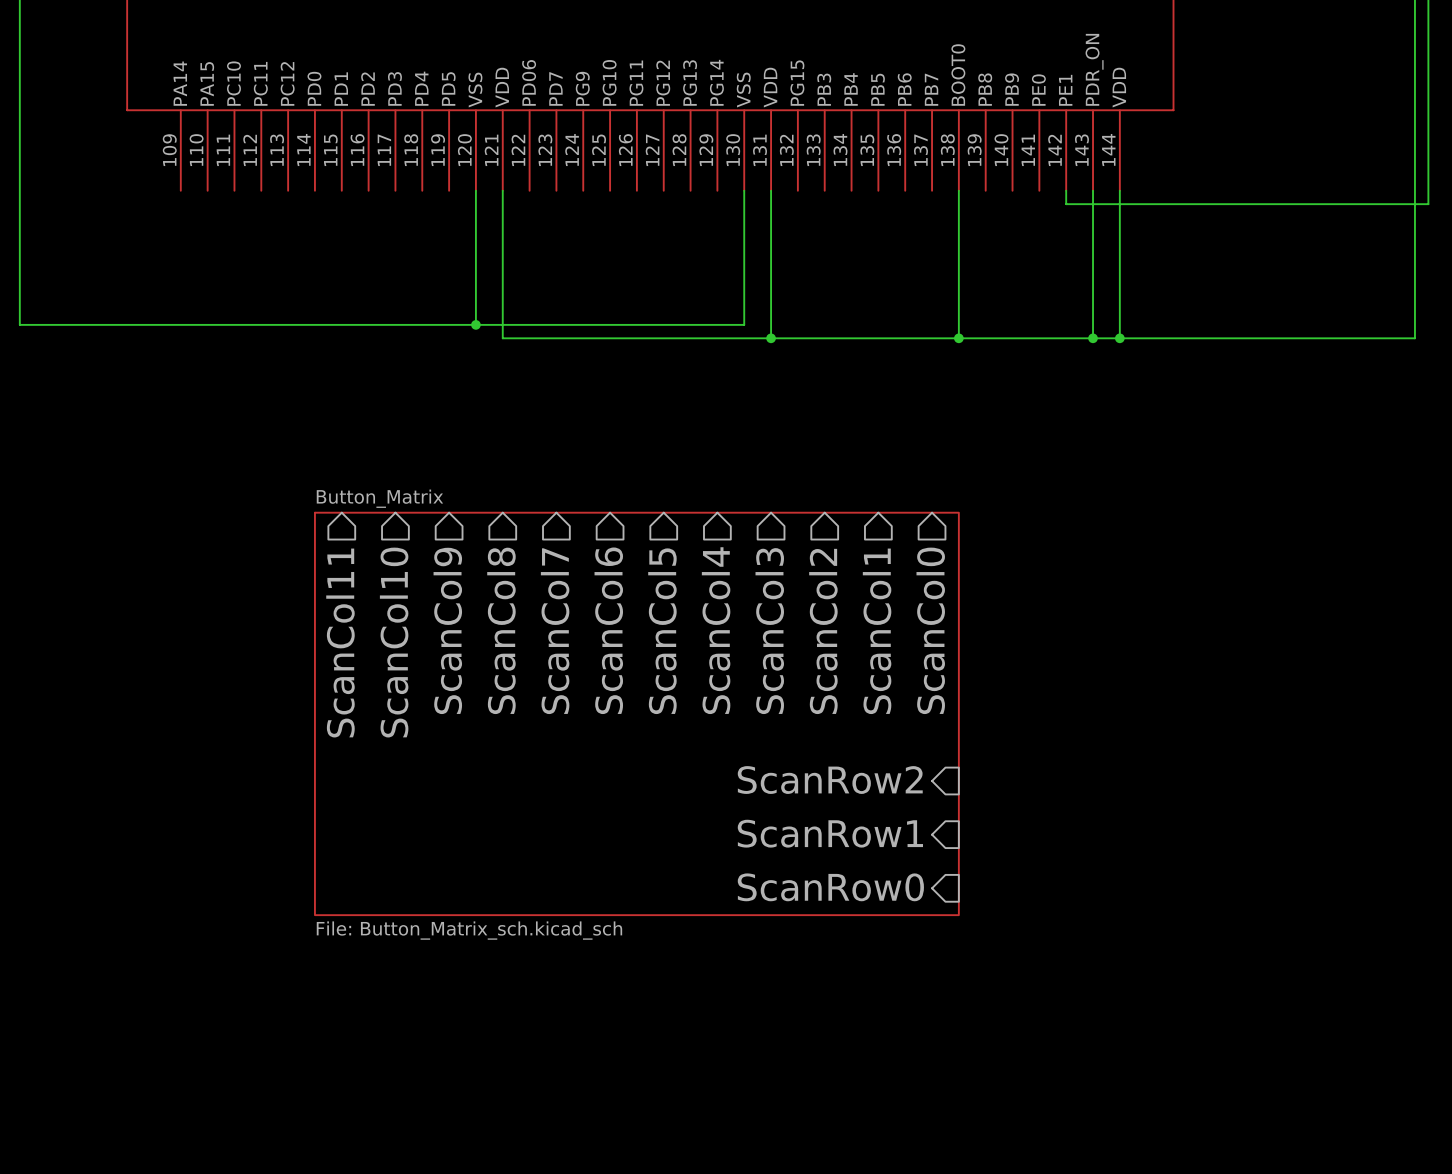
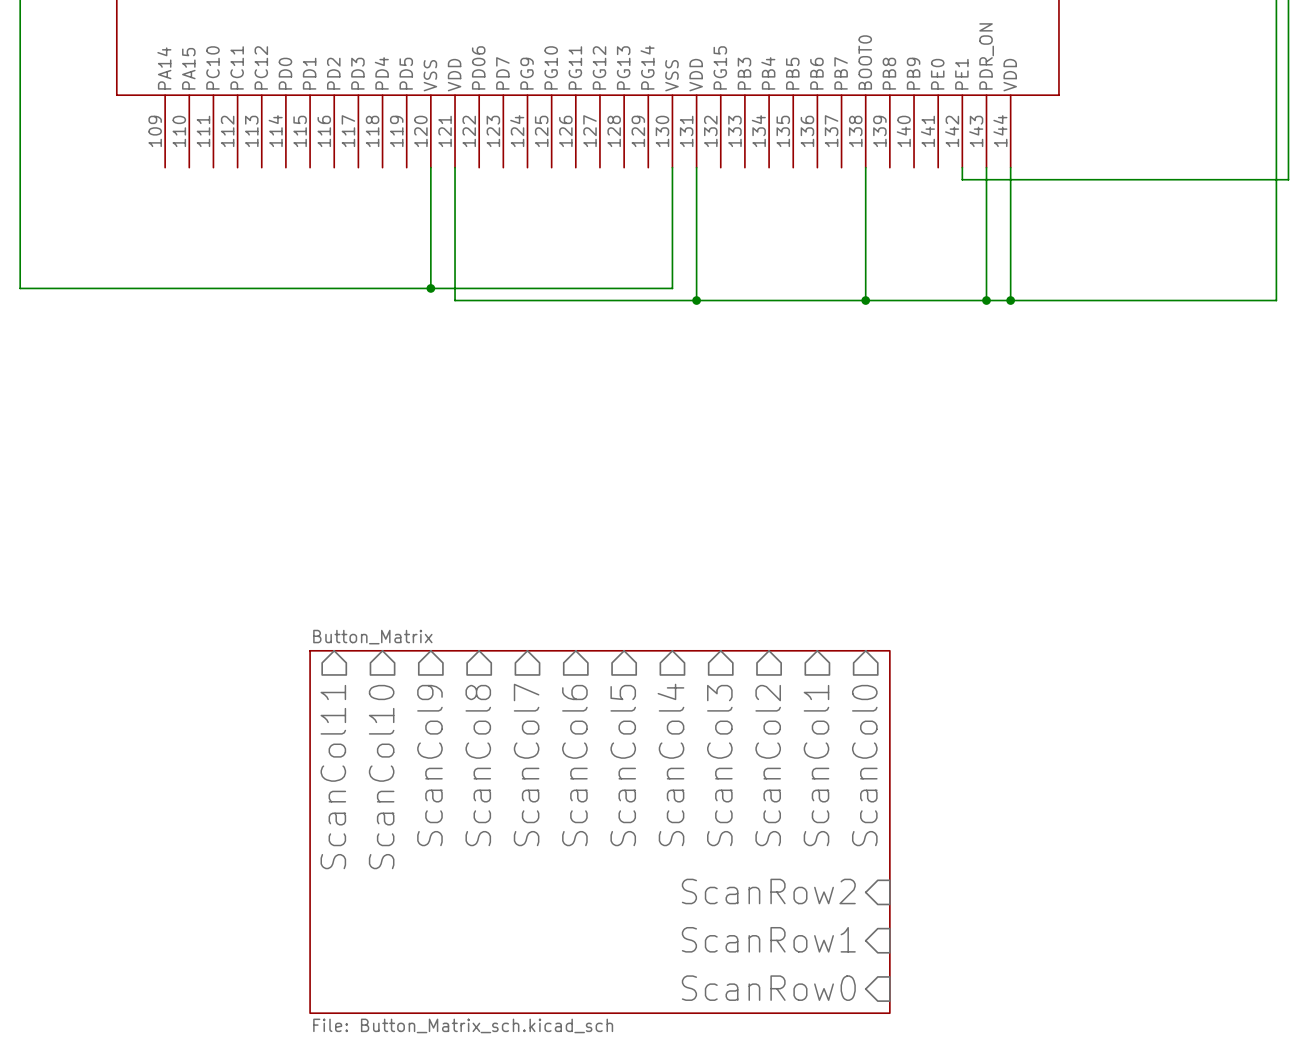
sheet pin position: ScanCol9 (447, 630) -> ScanCol9 (429, 765)
sheet pin position: ScanCol8 (501, 630) -> ScanCol8 (478, 765)
sheet pin position: ScanCol6 (608, 630) -> ScanCol6 (574, 765)
sheet pin position: ScanCol4 (716, 630) -> ScanCol4 (670, 764)
sheet pin position: ScanCol0 (930, 630) -> ScanCol0 (864, 765)
sheet pin position: ScanCol7 (555, 631) -> ScanCol7 (526, 764)
sheet pin position: ScanCol5 (662, 631) -> ScanCol5 (623, 765)
sheet pin position: ScanCol3 (769, 631) -> ScanCol3 (719, 765)
sheet pin position: ScanCol2 (823, 631) -> ScanCol2 (768, 765)
sheet pin position: ScanCol1 (877, 631) -> ScanCol1 (816, 765)
sheet pin position: ScanCol10 (394, 642) -> ScanCol10 (381, 777)
sheet pin position: ScanCol11 (340, 643) -> ScanCol11 (333, 777)
sheet Button_Matrix position: (636, 713) -> (599, 831)
sheet pin position: ScanRow2 (830, 780) -> ScanRow2 (768, 891)
sheet pin position: ScanRow1 (830, 833) -> ScanRow1 (768, 939)
sheet pin position: ScanRow0 (830, 887) -> ScanRow0 (768, 988)

